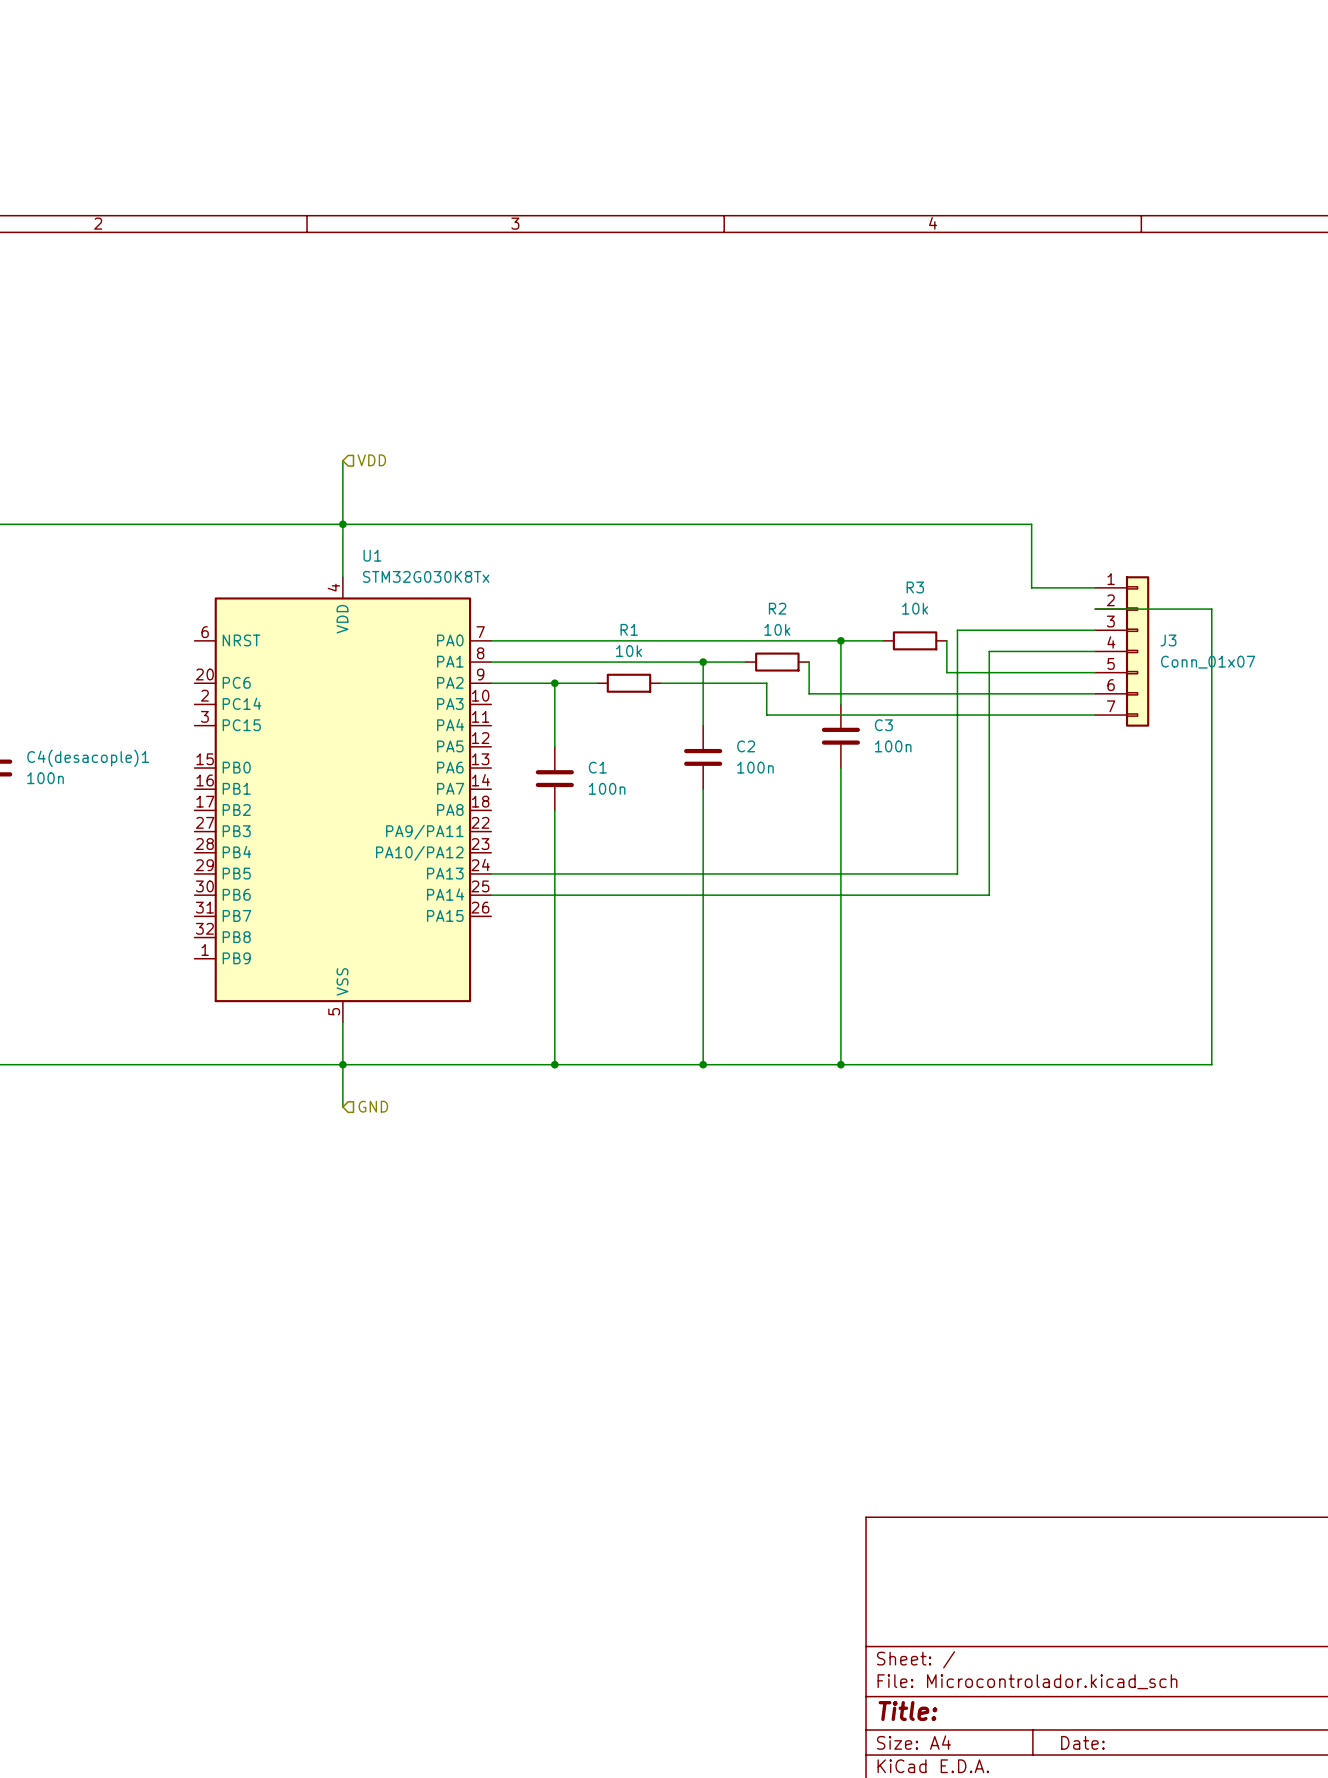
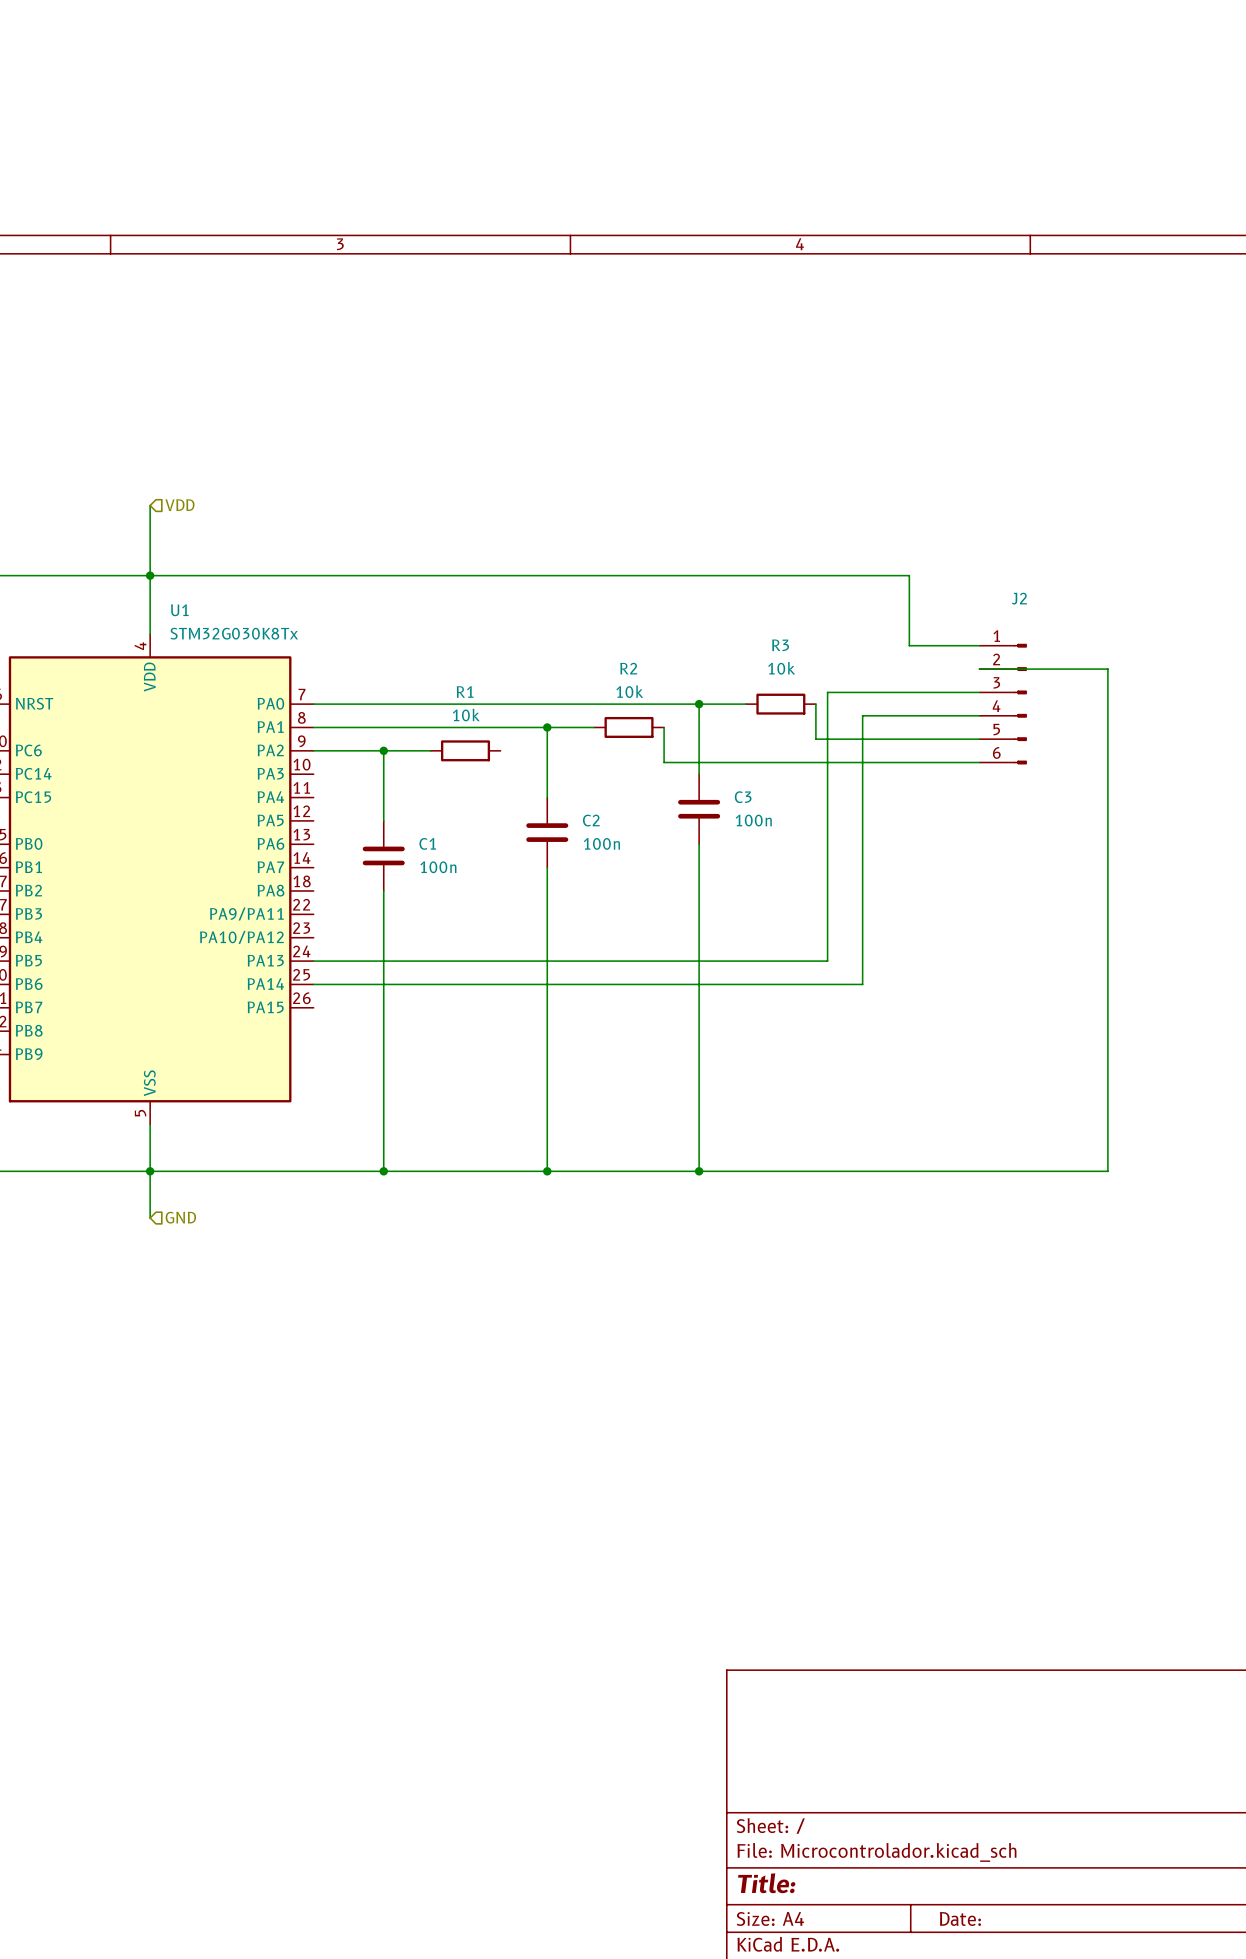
J2: none -> (1003, 704)
J3: Conn_01x07 (1122, 651) -> none
wire: (660, 683) (766, 683) (766, 715) (1095, 715) -> none

